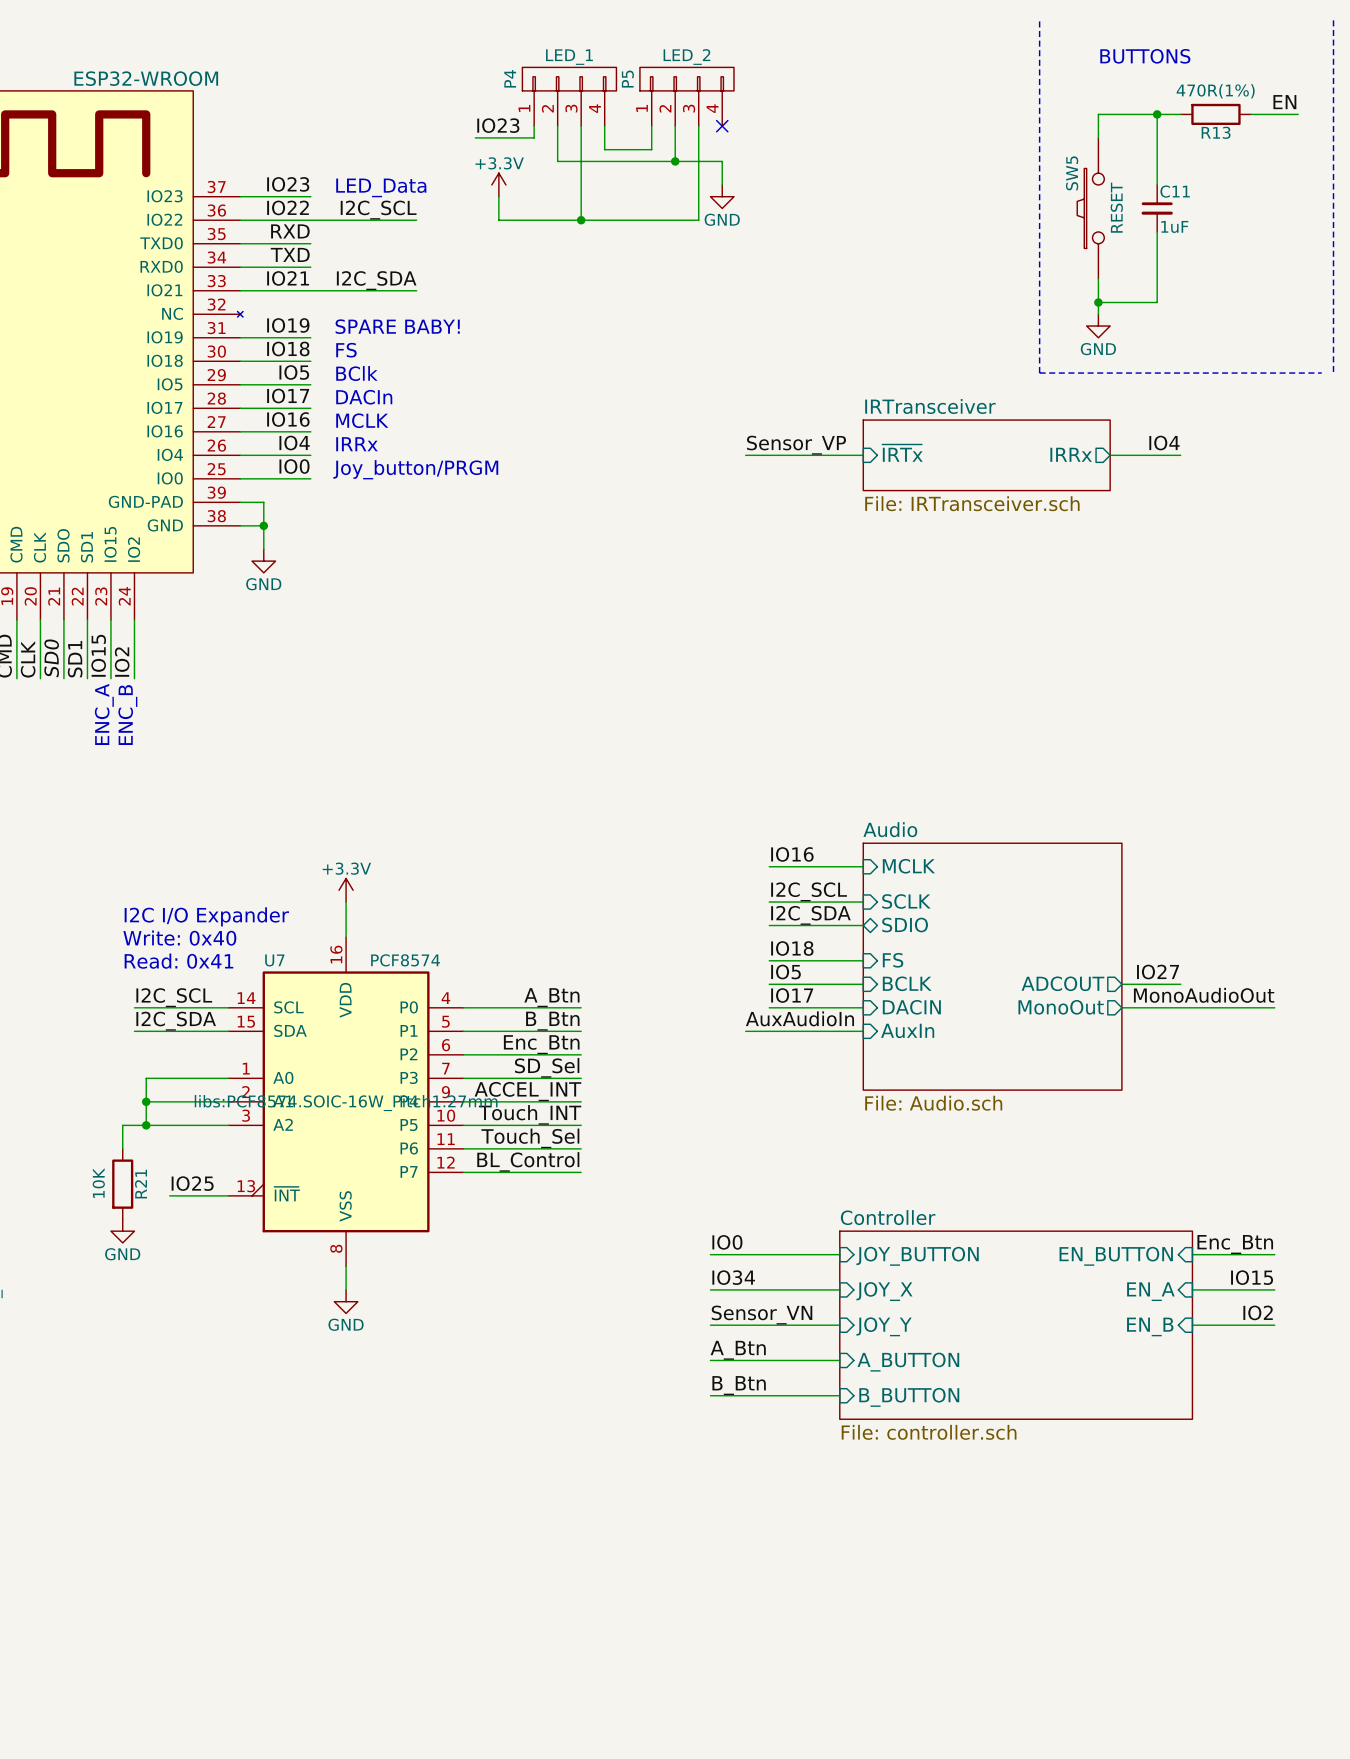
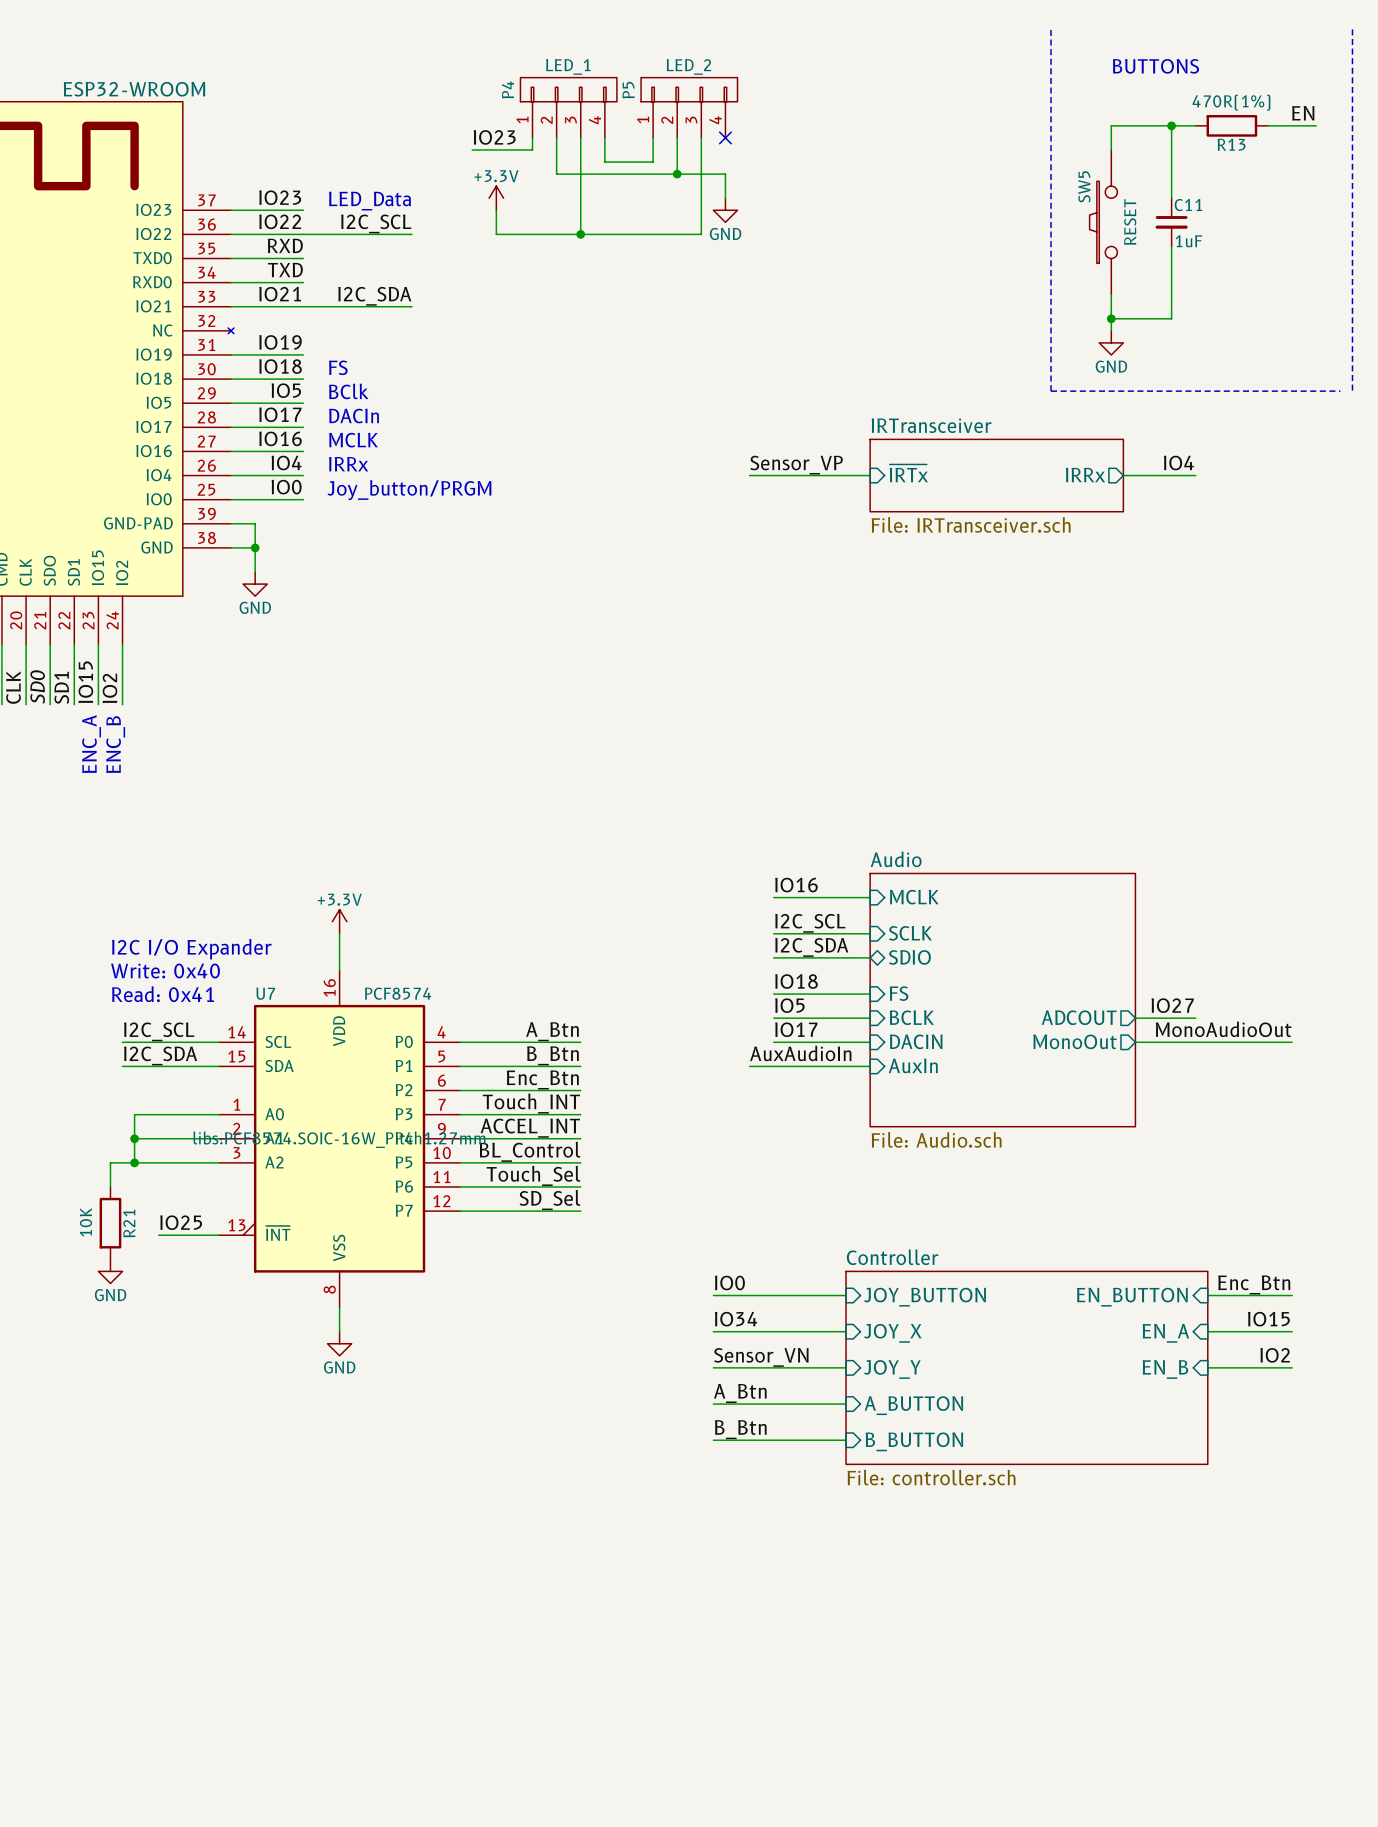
text: SPARE BABY! (397, 326) -> none
label: SD_Sel (547, 1067) -> Touch_INT (531, 1103)
label: Touch_INT (530, 1114) -> BL_Control (530, 1151)
label: BL_Control (528, 1161) -> SD_Sel (550, 1200)

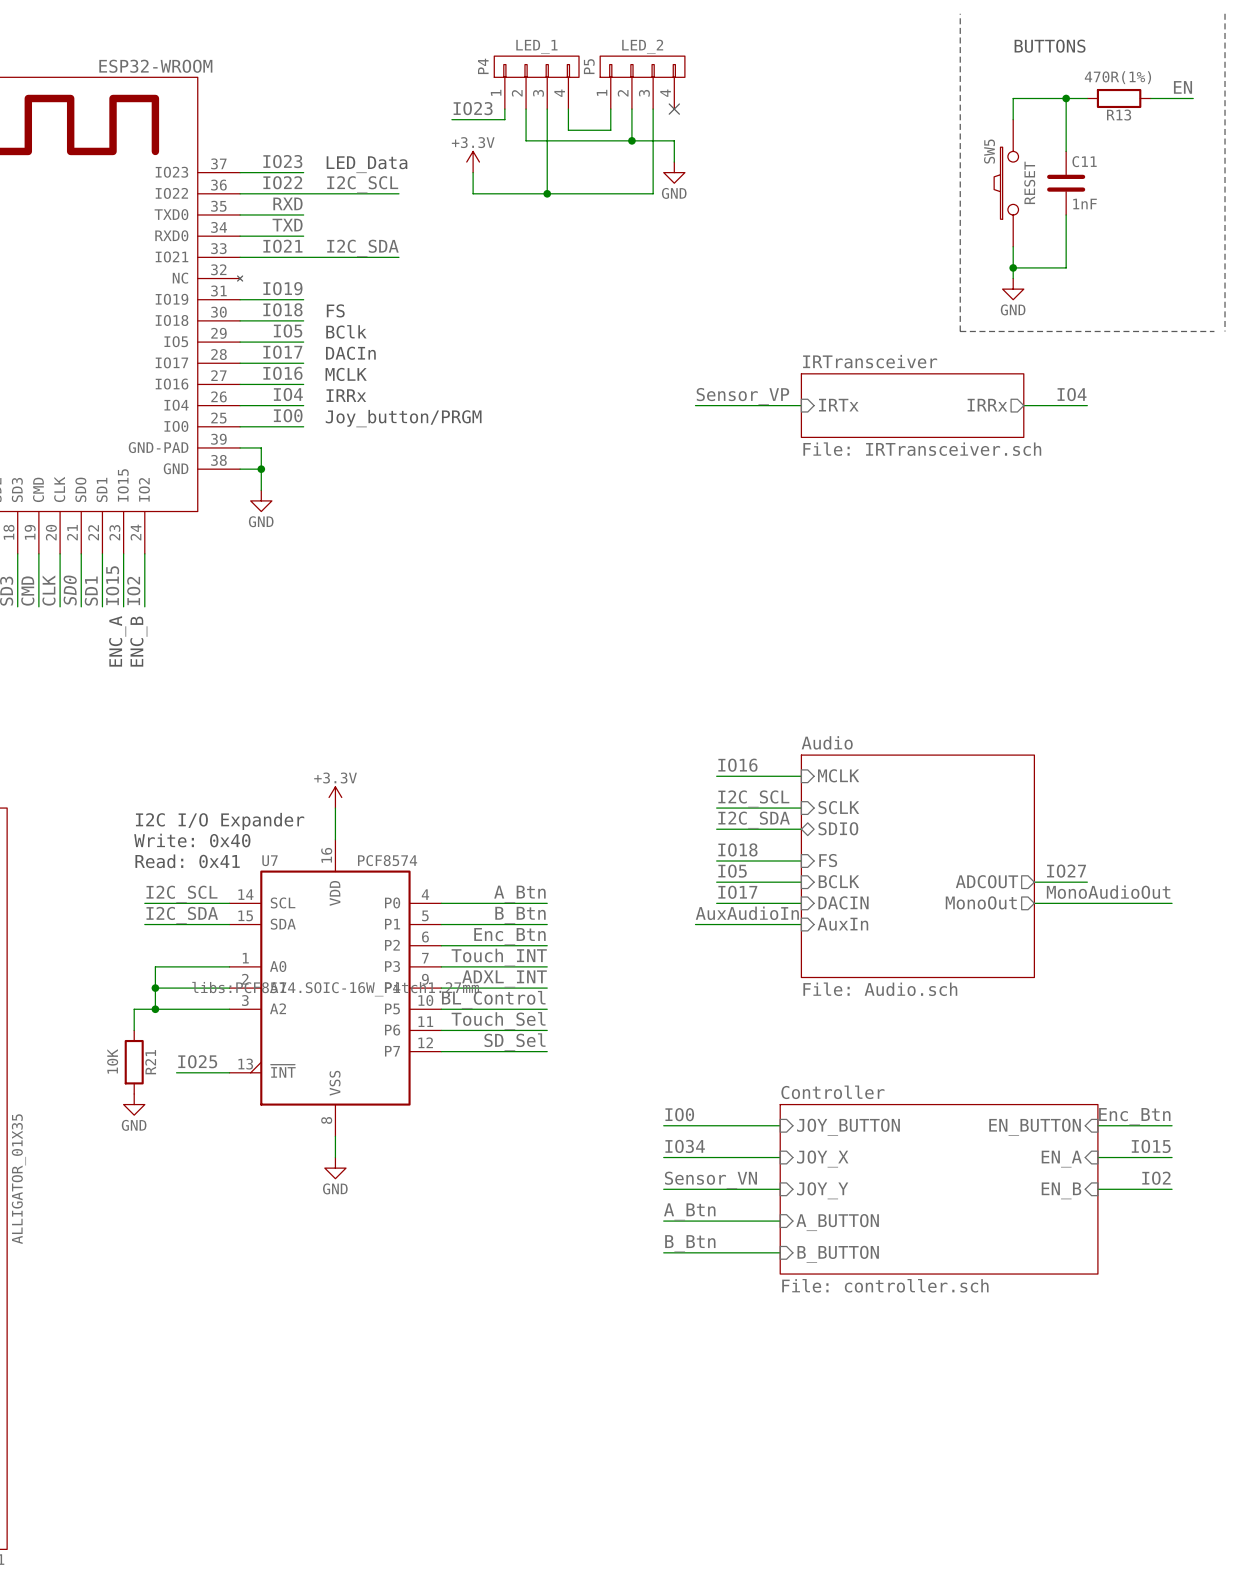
C11 symbol: [1155, 198, 1188, 247] -> [1047, 151, 1086, 215]
C11 value: 1uF (1188, 241) -> 1nF (1085, 204)
sheet pin: ~{IRTx} (908, 473) -> IRTx (838, 405)
label: ACCEL_INT (530, 1128) -> ADXL_INT (504, 978)

